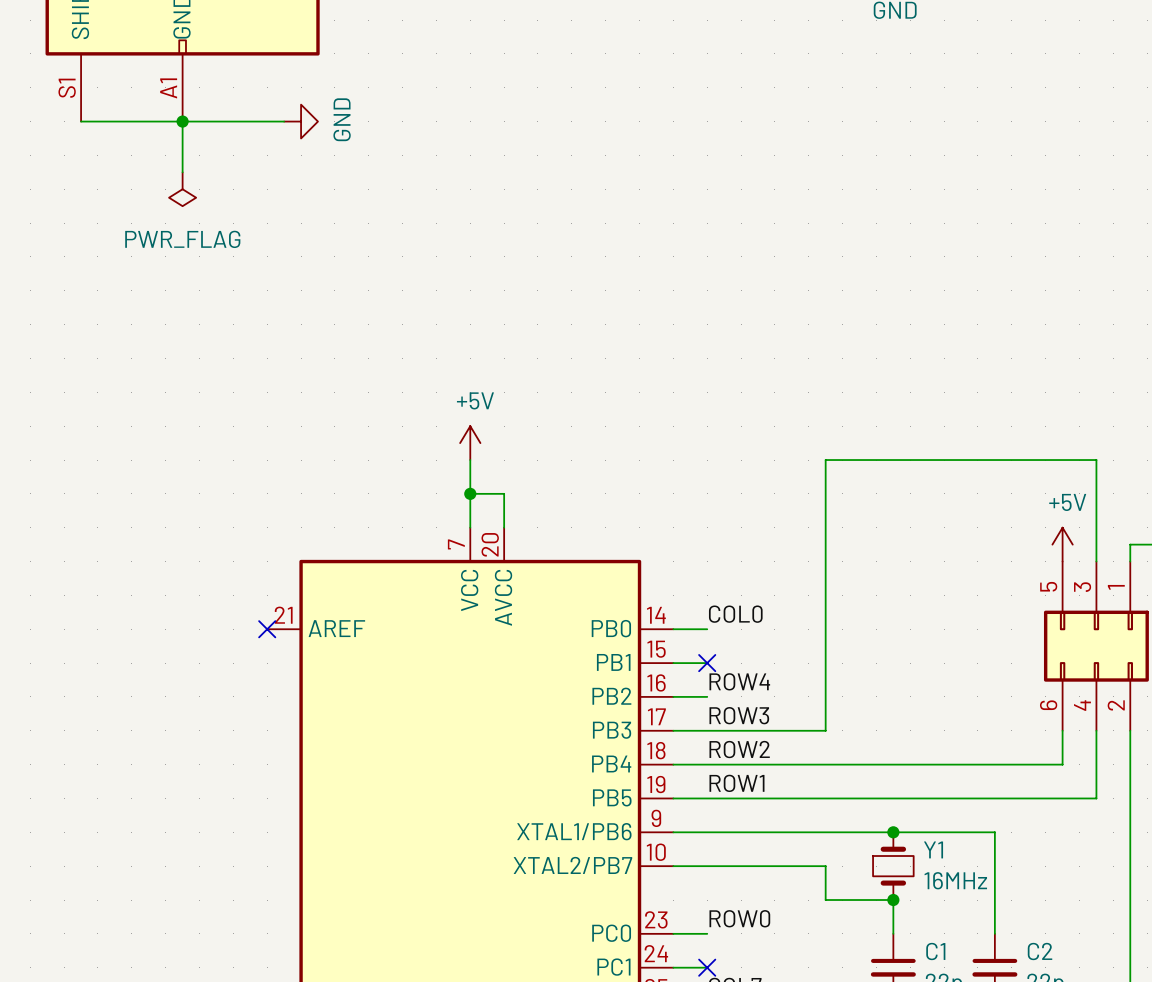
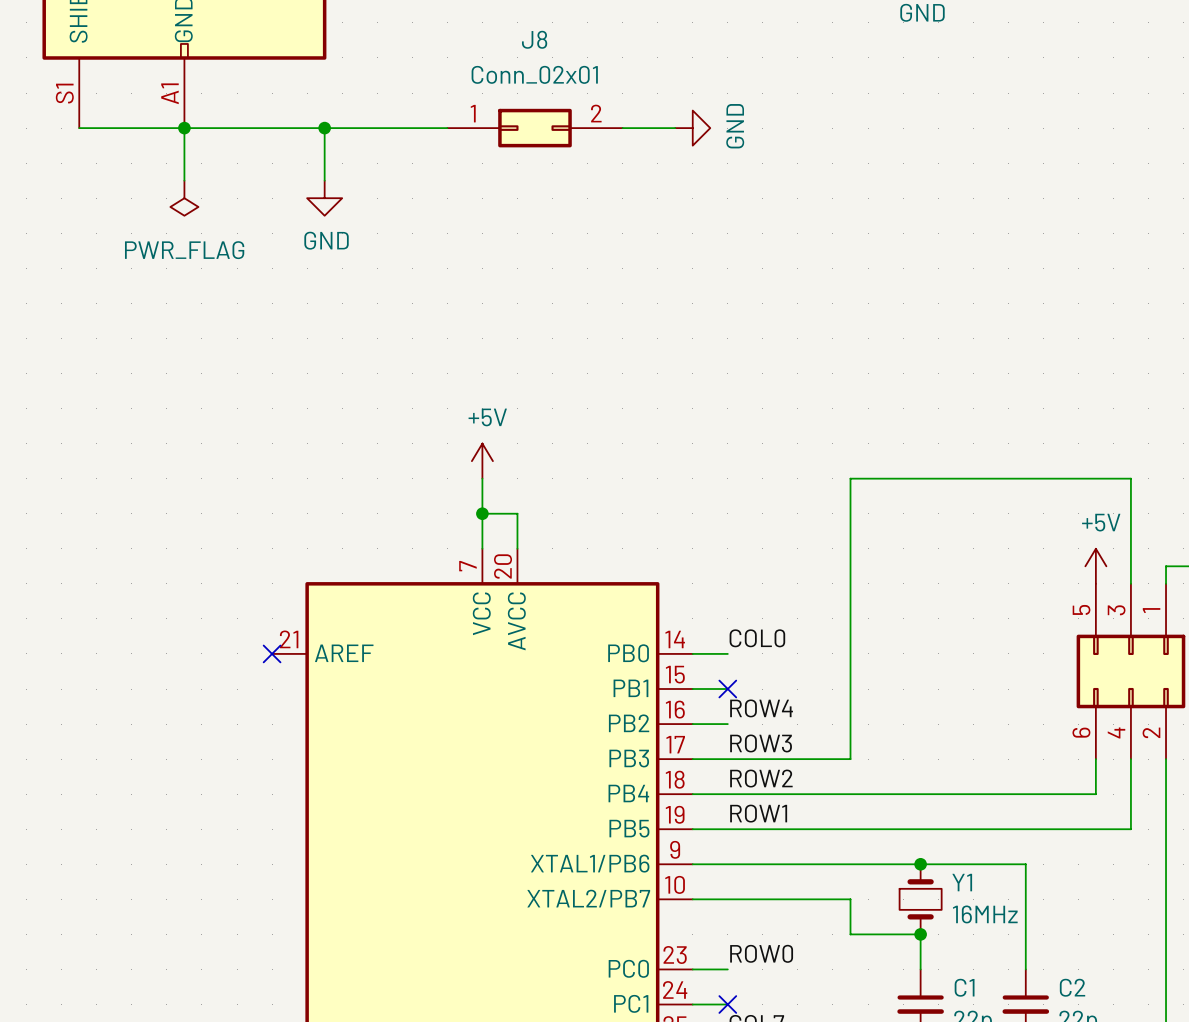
wire: none -> (289, 128) (447, 128)
power symbol rotation: 0° (301, 121) -> 90° clockwise (324, 198)
power symbol position: GND (301, 121) -> GND (324, 198)
wire: none -> (324, 128) (324, 180)
junction: none -> (324, 128)
J8: none -> Conn_02x01 (534, 128)
wire: none -> (622, 128) (675, 128)
power symbol: none -> GND (692, 128)

